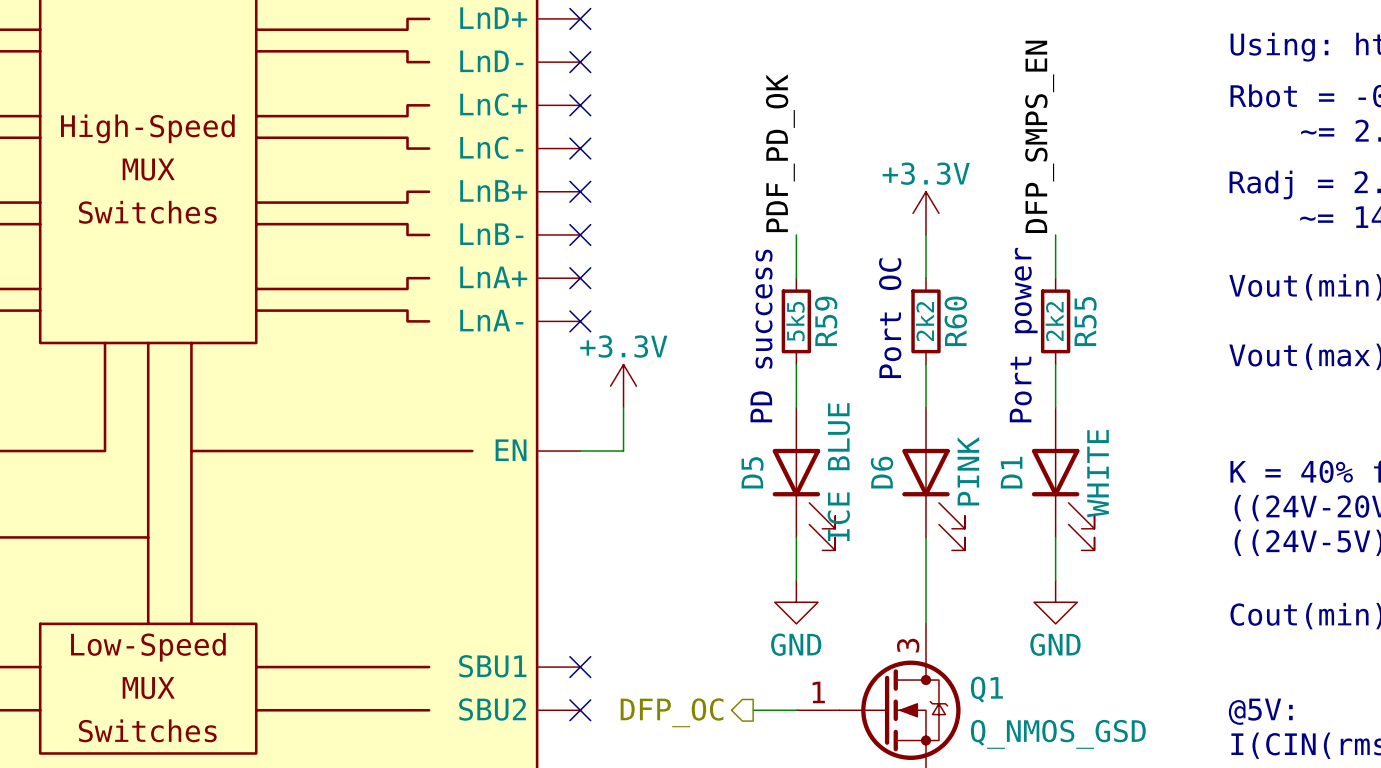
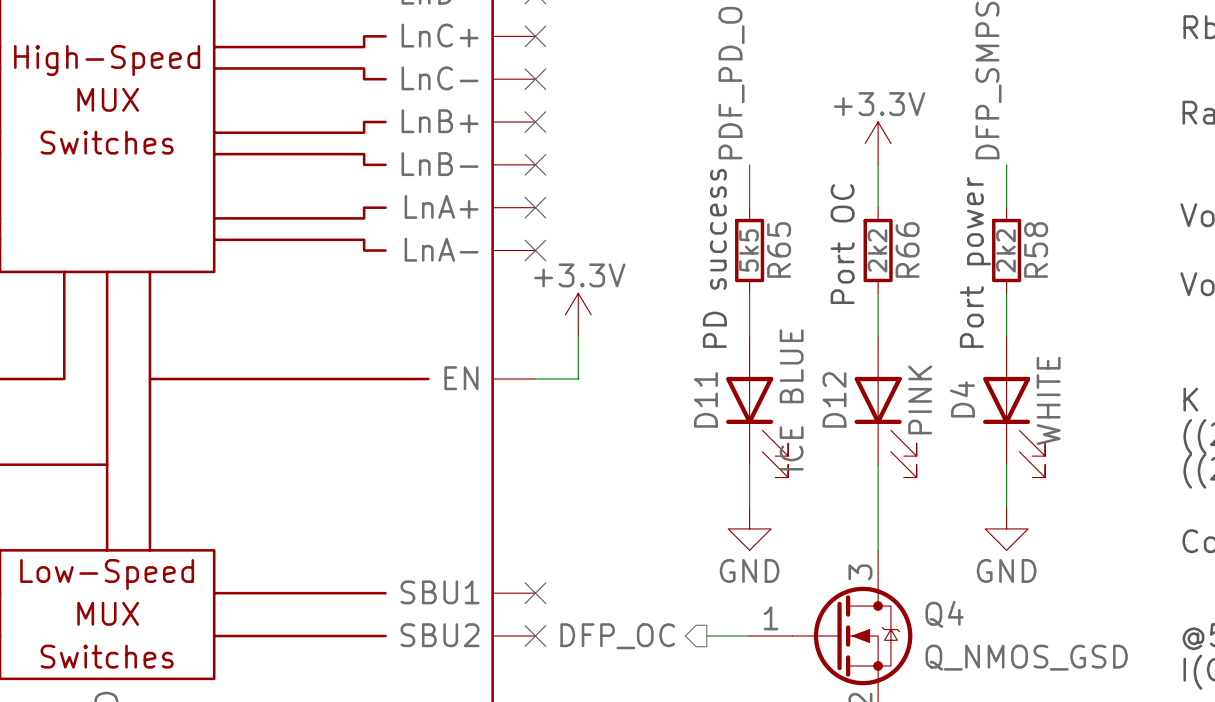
R59 name: R59 (826, 321) -> R65 (779, 250)
R60 name: R60 (955, 321) -> R66 (907, 250)
R55 name: R55 (1085, 321) -> R58 (1036, 250)
D5 name: D5 (752, 472) -> D11 (705, 399)
D6 name: D6 (882, 472) -> D12 (834, 399)
D1 name: D1 (1011, 472) -> D4 (962, 399)
Q1 name: Q1 (986, 689) -> Q4 (944, 614)

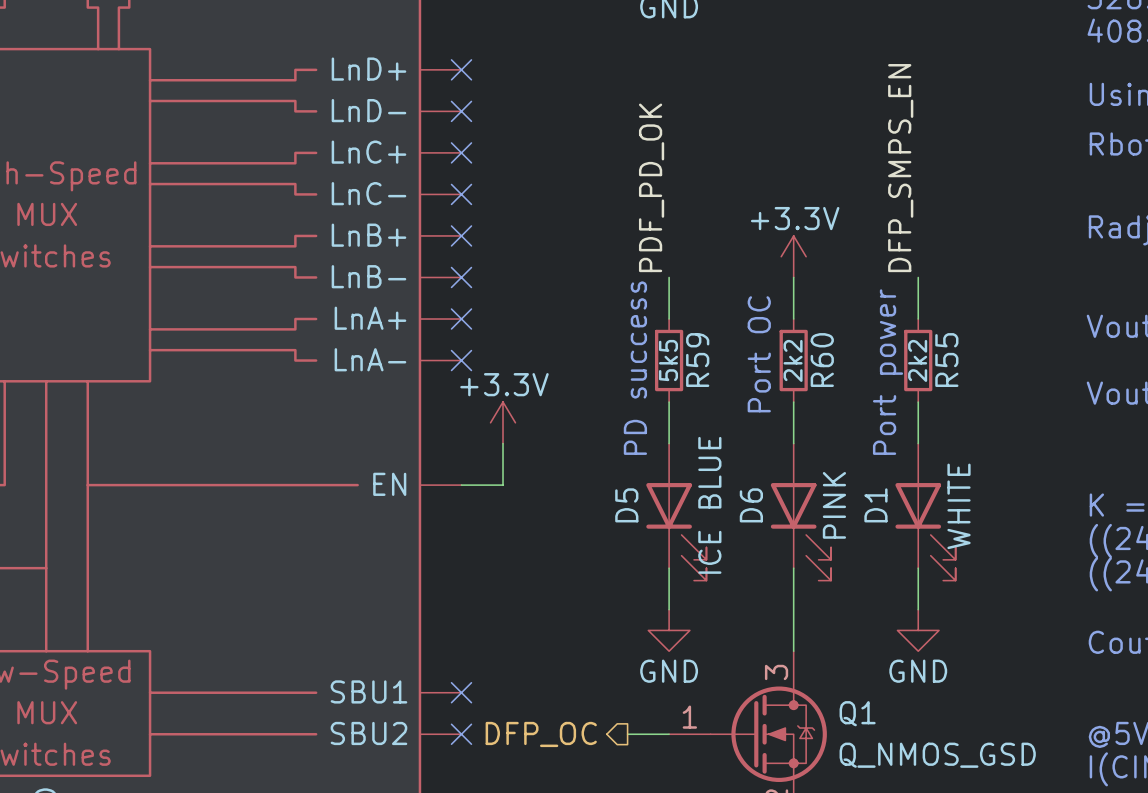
R65 name: R65 (779, 250) -> R59 (697, 360)
R66 name: R66 (907, 250) -> R60 (822, 360)
R58 name: R58 (1036, 250) -> R55 (946, 360)
D11 name: D11 (705, 399) -> D5 (626, 505)
D12 name: D12 (834, 399) -> D6 (751, 505)
D4 name: D4 (962, 399) -> D1 (875, 505)
Q4 name: Q4 (944, 614) -> Q1 (857, 713)

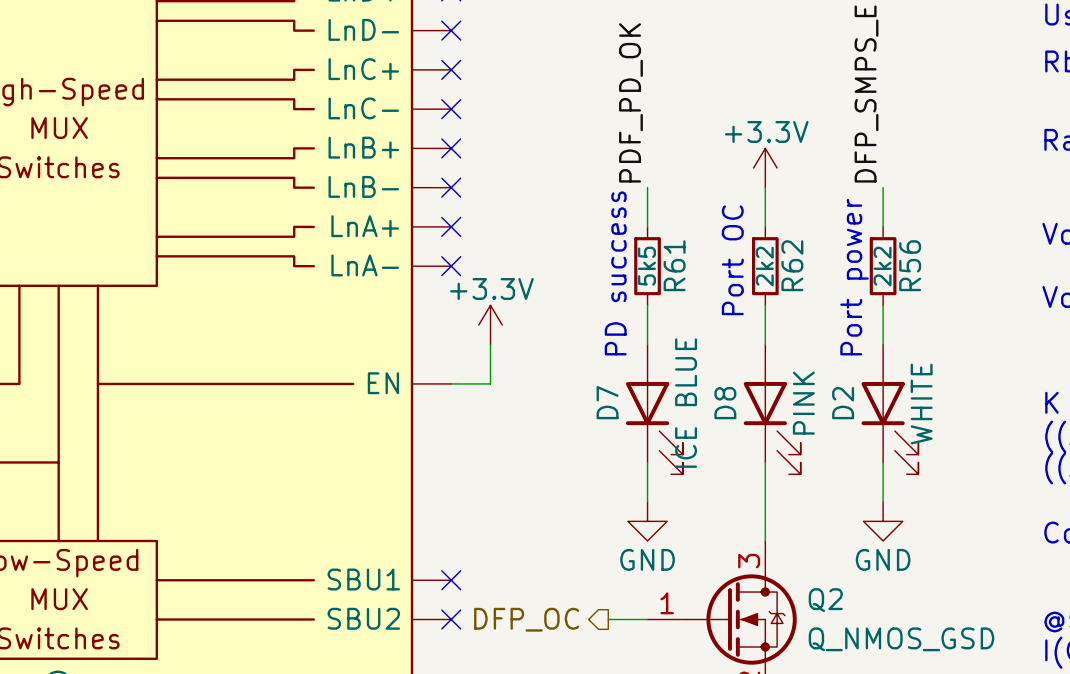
R59 name: R59 (697, 360) -> R61 (674, 265)
R60 name: R60 (822, 360) -> R62 (792, 265)
R55 name: R55 (946, 360) -> R56 (910, 265)
D5 name: D5 (626, 505) -> D7 (607, 402)
D6 name: D6 (751, 505) -> D8 (725, 403)
D1 name: D1 (875, 505) -> D2 (843, 403)
Q1 name: Q1 (857, 713) -> Q2 (825, 600)

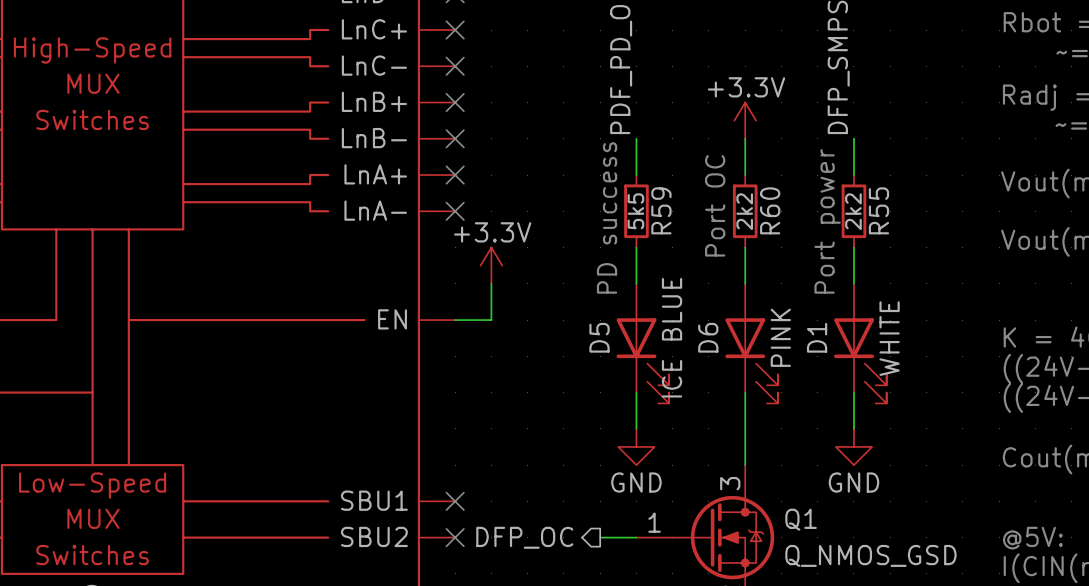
R61 name: R61 (674, 265) -> R59 (661, 210)
R62 name: R62 (792, 265) -> R60 (770, 210)
R56 name: R56 (910, 265) -> R55 (878, 210)
D7 name: D7 (607, 402) -> D5 (599, 337)
D8 name: D8 (725, 403) -> D6 (708, 337)
D2 name: D2 (843, 403) -> D1 (817, 337)
Q2 name: Q2 (825, 600) -> Q1 (801, 519)

